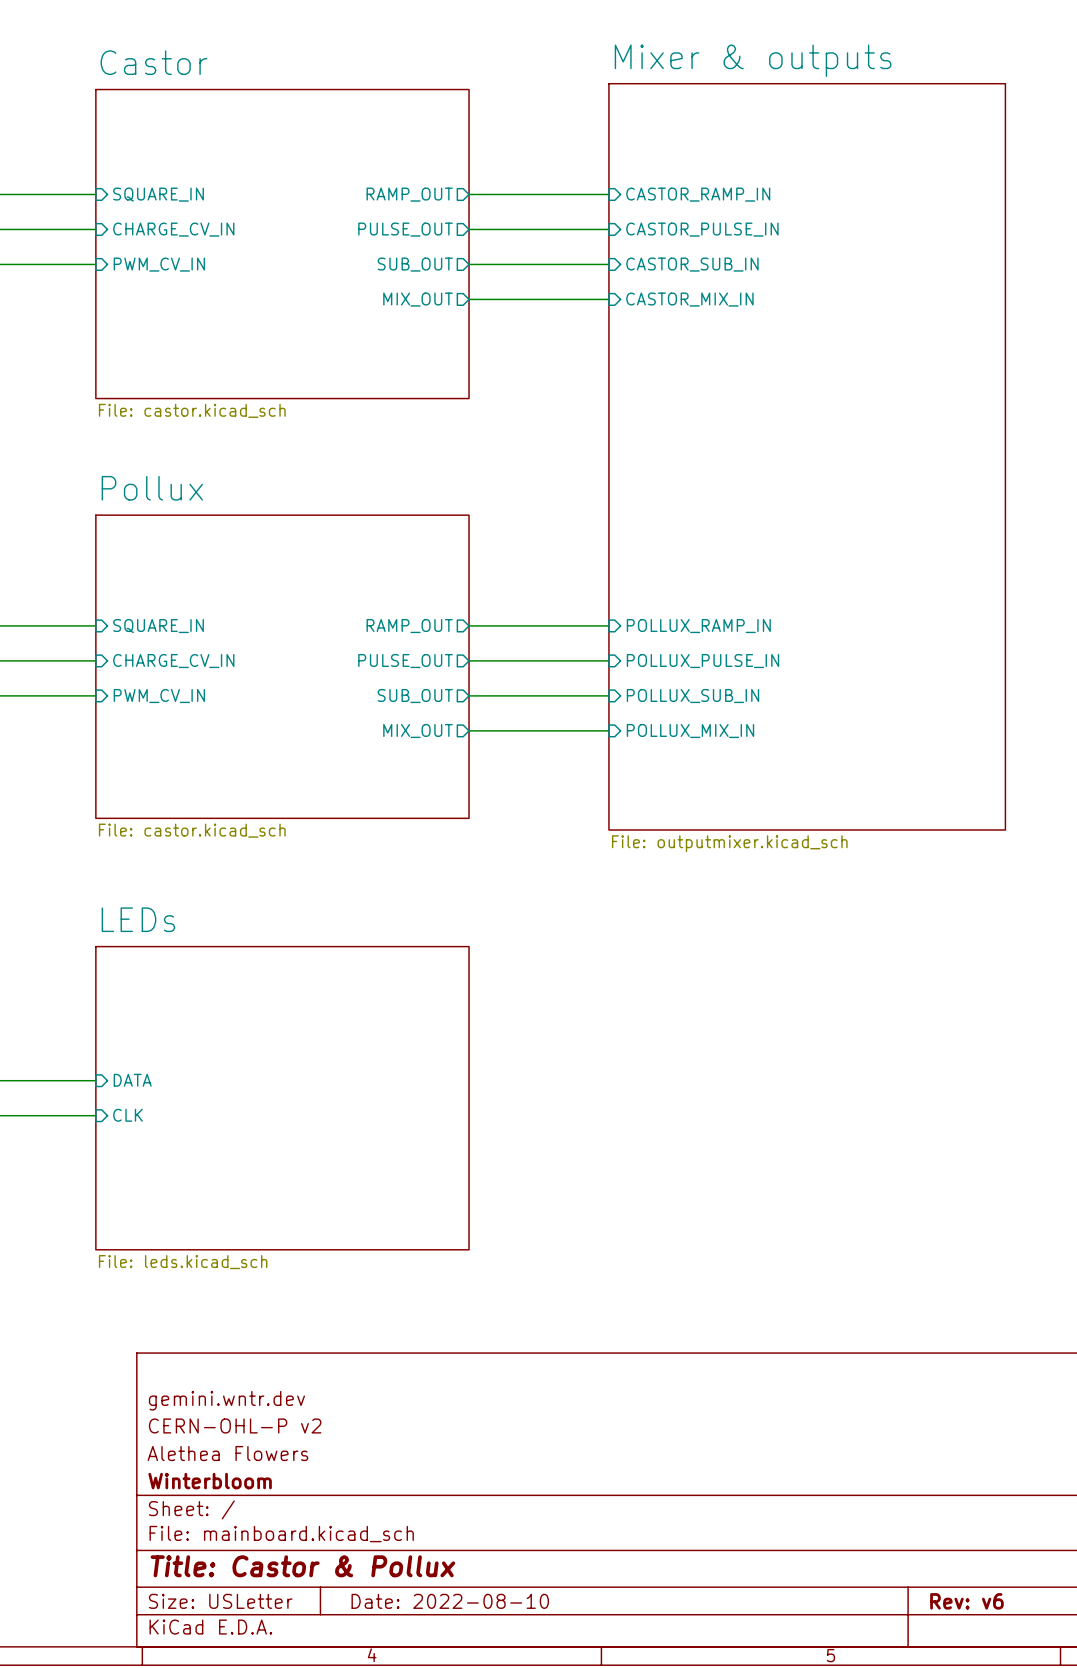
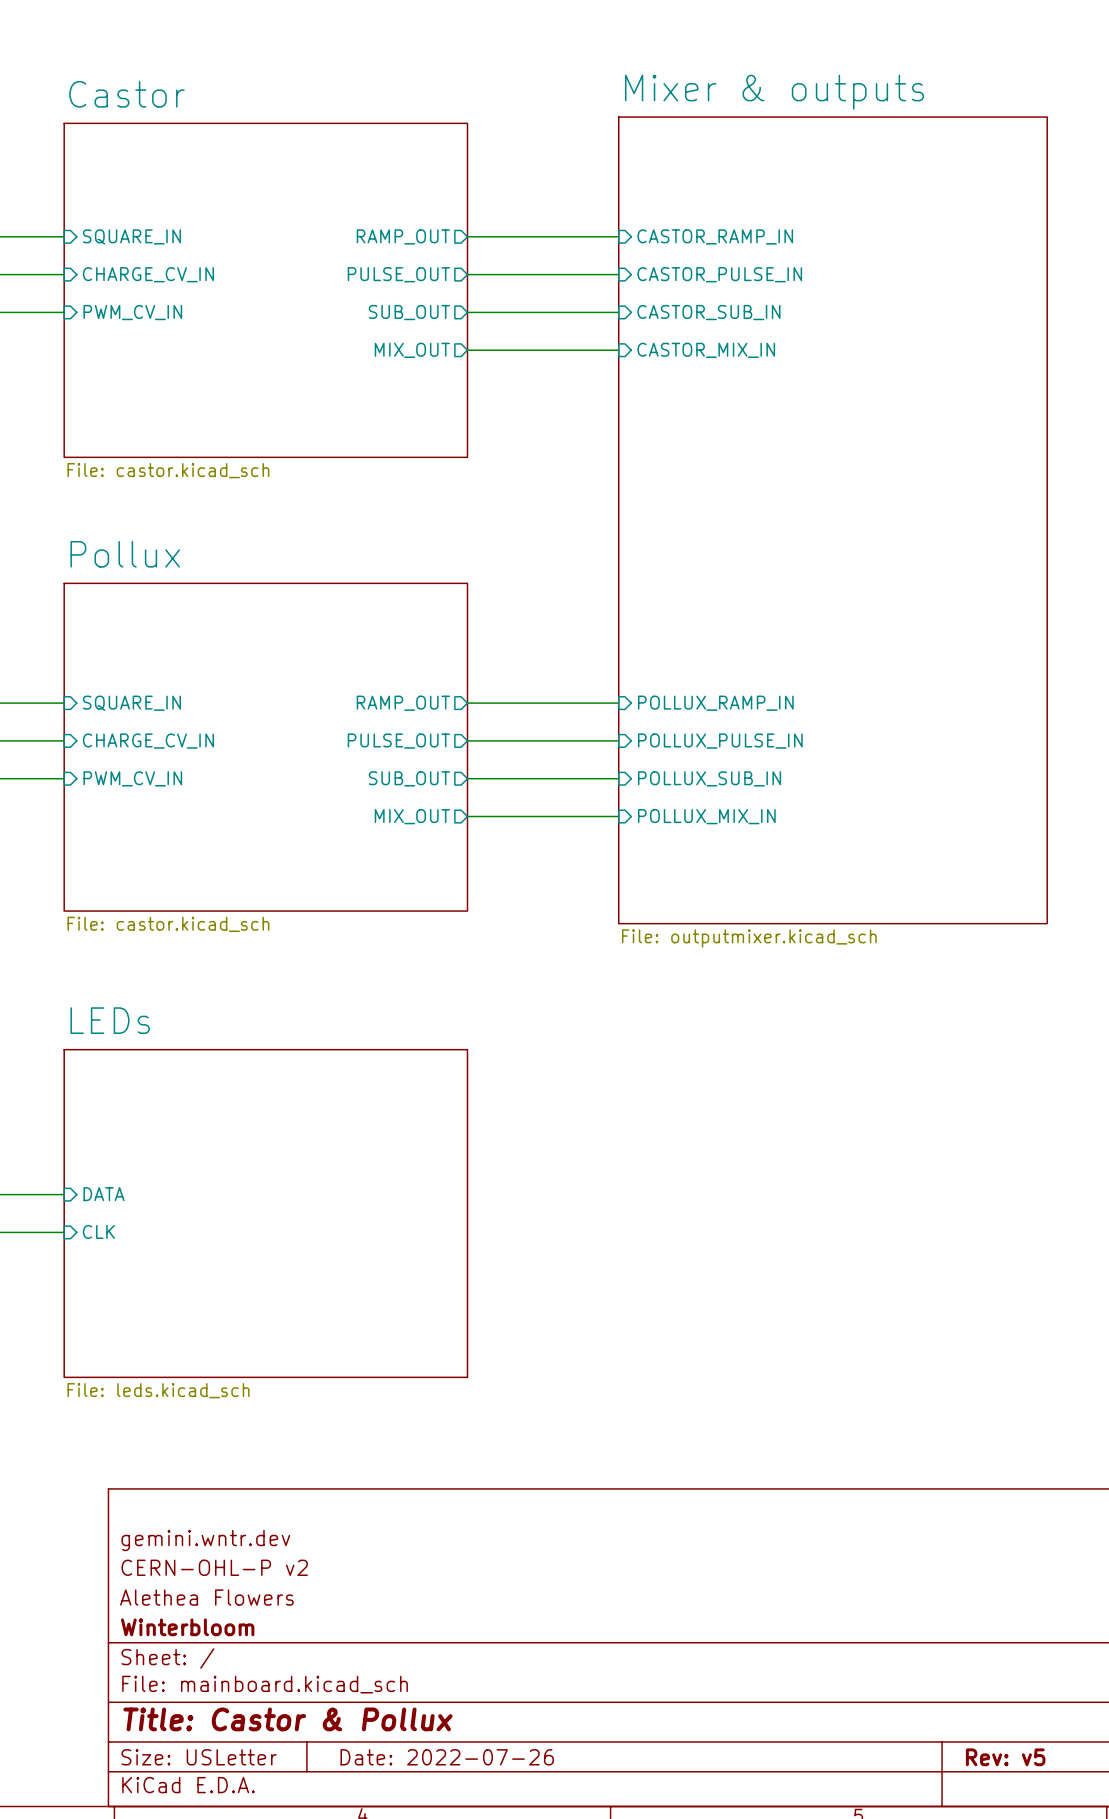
title block: Date: 2022-08-10 (450, 1601) -> Date: 2022-07-26 (447, 1757)
title block: Rev: v6 (966, 1601) -> Rev: v5 (1005, 1757)

